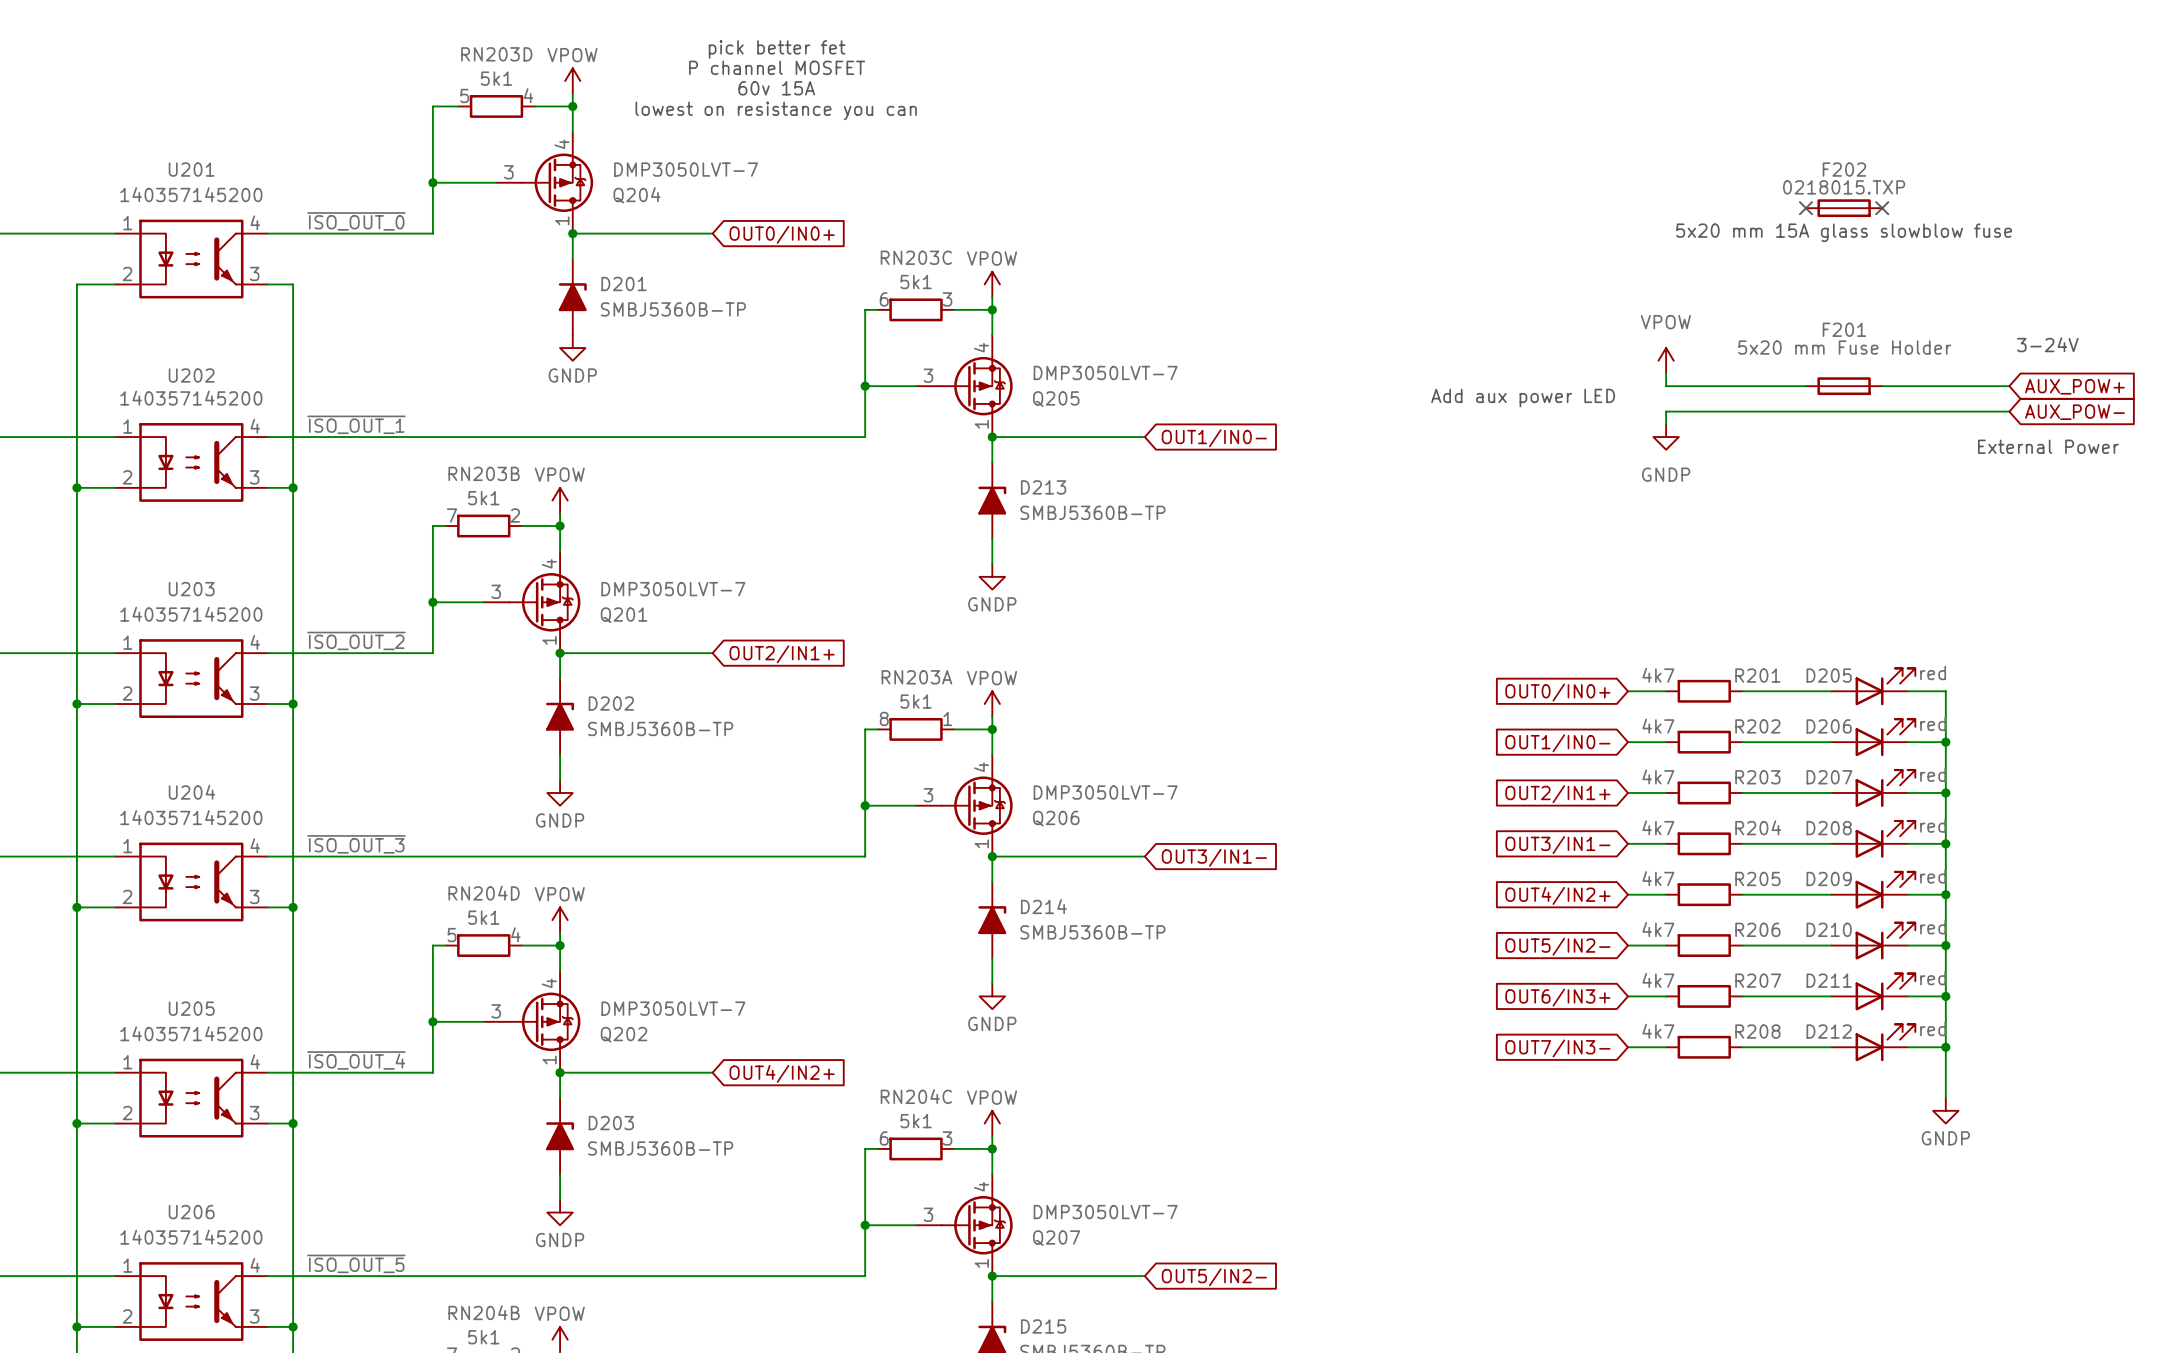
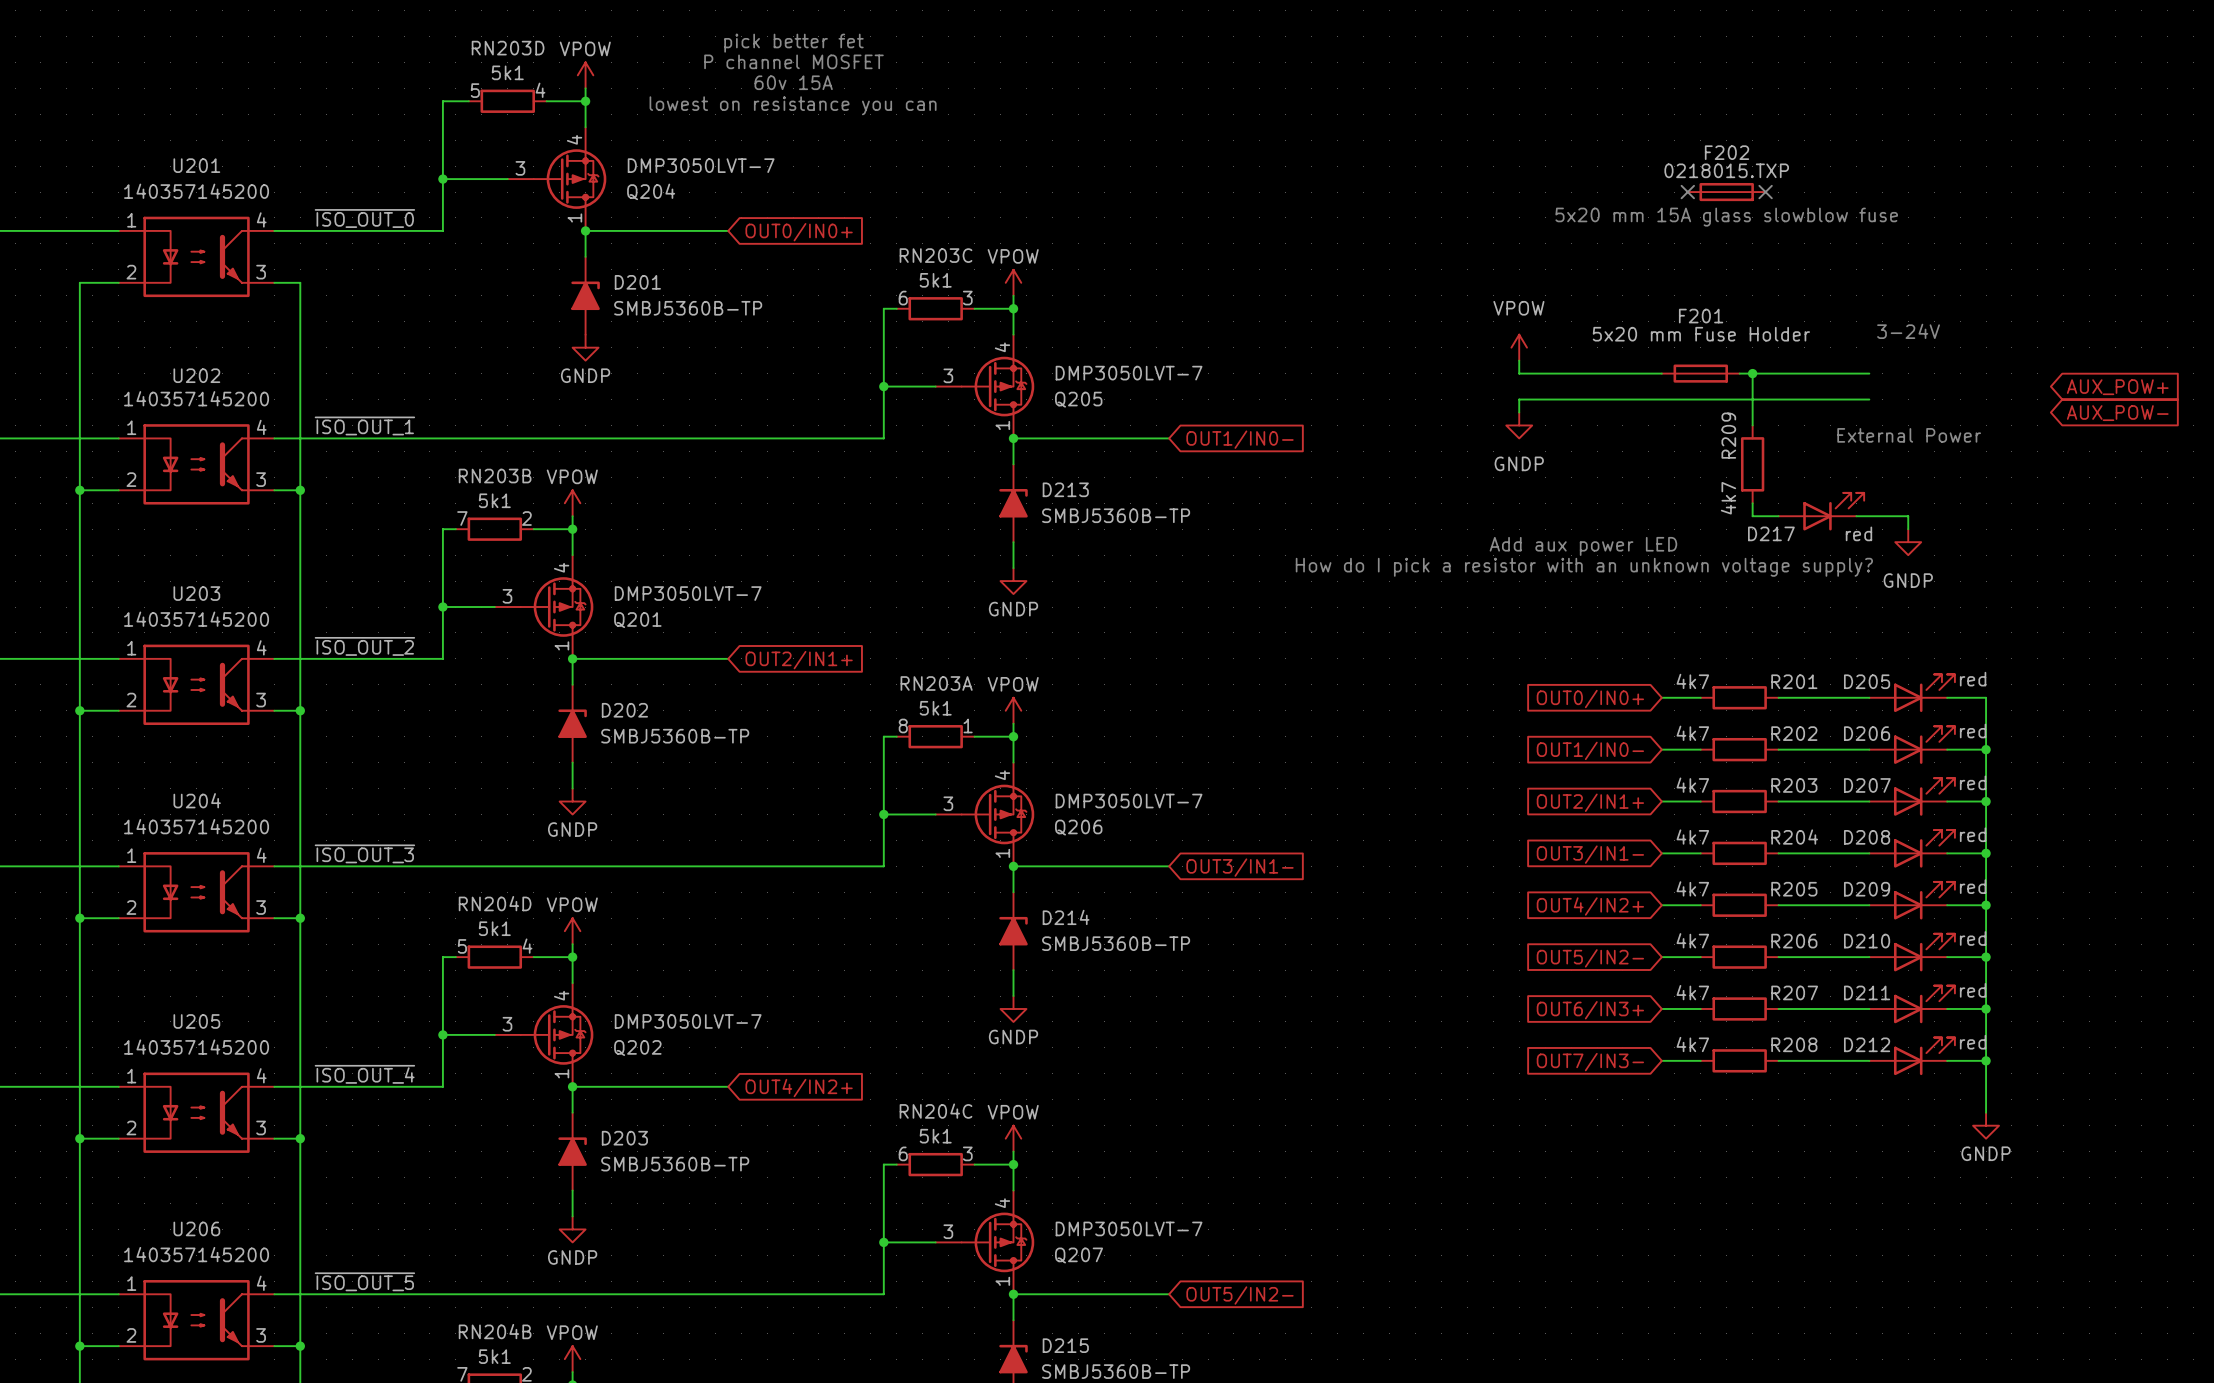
no-connect mark: none -> (1687, 192)
no-connect mark: none -> (1765, 192)
no-connect mark: (1805, 208) -> none
F202 position: (1844, 208) -> (1726, 192)
no-connect mark: (1882, 208) -> none
text position: 5x20 mm 15A glass slowblow fuse (1844, 232) -> 5x20 mm 15A glass slowblow fuse (1726, 217)
text position: 3-24V (2047, 344) -> 3-24V (1908, 331)
power symbol position: VPOW (1666, 360) -> VPOW (1519, 347)
wire: (1666, 373) (1666, 386) (1805, 386) -> (1519, 360) (1519, 373) (1661, 373)
wire: none -> (1752, 373) (1752, 425)
junction: none -> (1752, 373)
F201 position: (1844, 386) -> (1700, 373)
wire: (1882, 386) (2009, 386) -> (1739, 373) (1869, 373)
text position: Add aux power LED (1523, 398) -> Add aux power LED (1583, 546)
wire: (2009, 411) (1666, 411) (1666, 424) -> (1869, 399) (1519, 399) (1519, 412)
power symbol: none -> GNDP (1519, 425)
power symbol: GNDP (1666, 437) -> none
text position: External Power (2048, 446) -> External Power (1909, 435)
R209: none -> 4k7 (1752, 464)
wire: none -> (1752, 503) (1752, 516) (1778, 516)
D217: none -> red (1821, 511)
wire: none -> (1856, 516) (1908, 516) (1908, 529)
power symbol: none -> GNDP (1908, 542)
text: none -> How do I pick a resistor with an unknown voltage supply? (1584, 567)

